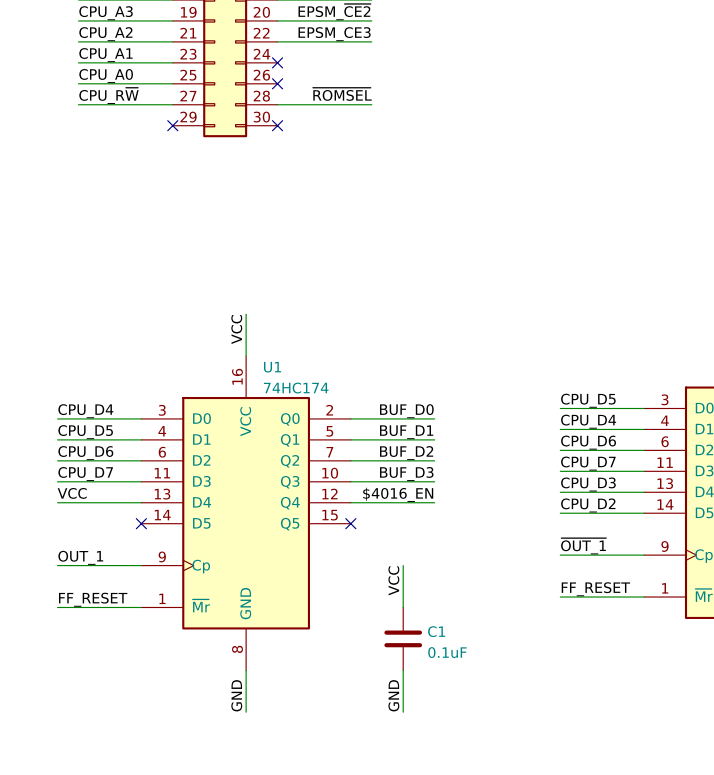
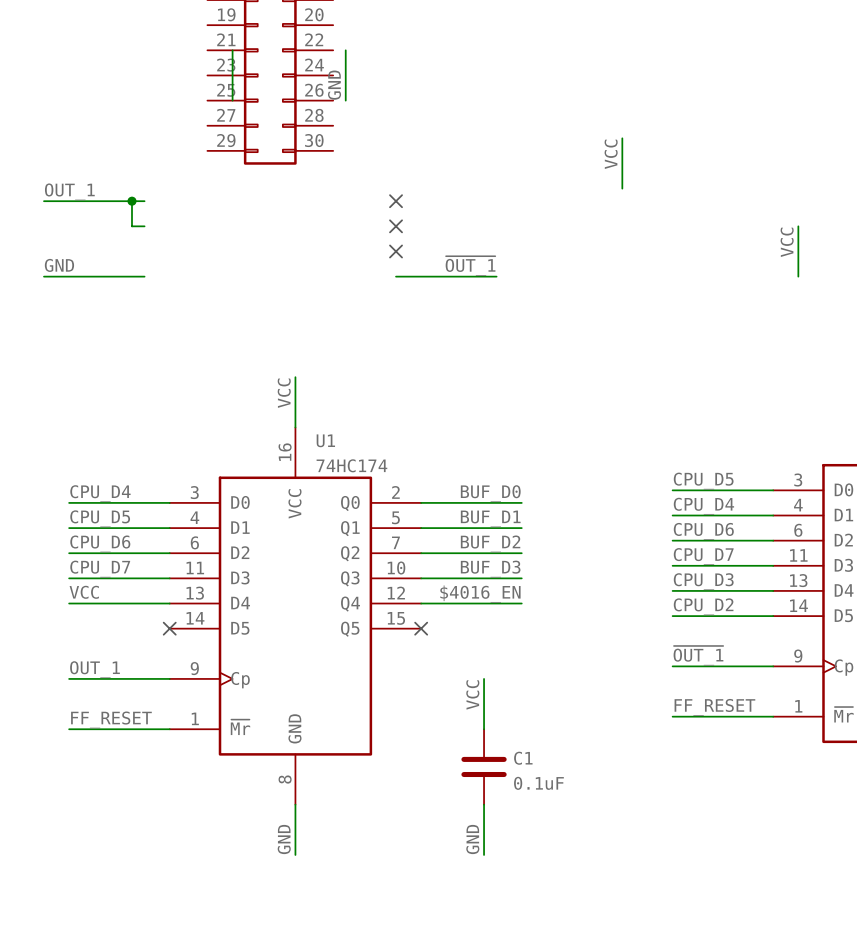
wire: (78, 0) (172, 0) -> none
wire: (277, 0) (371, 0) -> none
label: EPSM_~{CE2} (334, 12) -> none
label: CPU_A3 (106, 13) -> none
wire: (78, 20) (172, 20) -> none
wire: (277, 20) (371, 20) -> none
label: CPU_A2 (105, 34) -> none
label: EPSM_CE3 (334, 34) -> none
wire: (78, 41) (172, 41) -> none
wire: none -> (232, 50) (232, 100)
wire: (277, 41) (371, 41) -> none
wire: none -> (345, 50) (345, 100)
label: CPU_A1 (105, 55) -> none
wire: (78, 62) (172, 62) -> none
no-connect mark: (277, 62) -> none
label: none -> GND (334, 85)
label: CPU_A0 (106, 76) -> none
wire: (78, 83) (172, 83) -> none
no-connect mark: (277, 83) -> none
label: ~{ROMSEL} (342, 94) -> none
label: CPU_R~{W} (108, 95) -> none
wire: (78, 104) (172, 104) -> none
wire: (277, 104) (371, 104) -> none
wire: none -> (622, 138) (622, 188)
no-connect mark: (172, 125) -> none
no-connect mark: (277, 125) -> none
label: none -> VCC (611, 154)
label: none -> OUT_1 (69, 191)
wire: none -> (43, 201) (144, 201)
wire: none -> (131, 201) (131, 226) (144, 226)
junction: none -> (131, 201)
no-connect mark: none -> (396, 201)
no-connect mark: none -> (396, 226)
wire: none -> (798, 226) (798, 276)
label: none -> VCC (787, 242)
no-connect mark: none -> (396, 251)
label: none -> GND (59, 265)
label: none -> ~{OUT_1} (470, 265)
wire: none -> (43, 276) (144, 276)
wire: none -> (396, 276) (496, 276)

